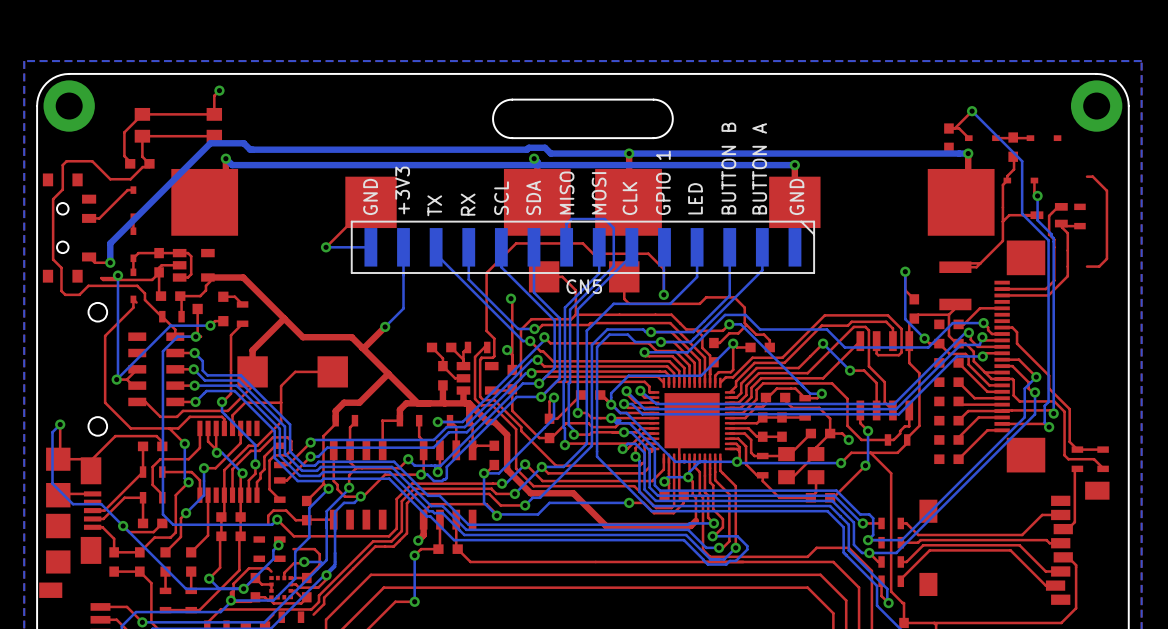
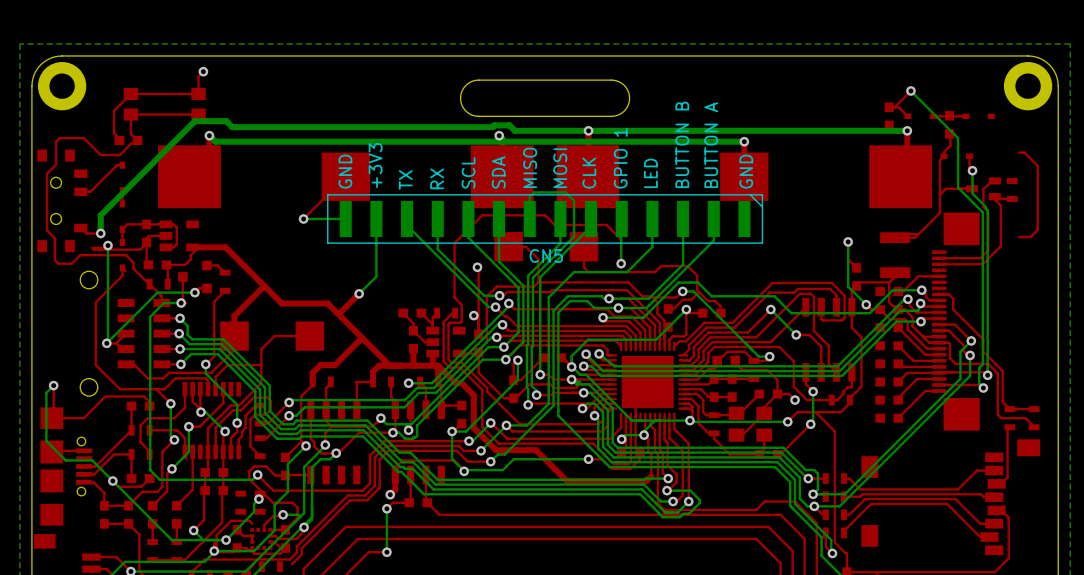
part footprint: [46, 447, 102, 574] -> [40, 407, 93, 526]
top track: none -> (249, 479) (272, 502)

